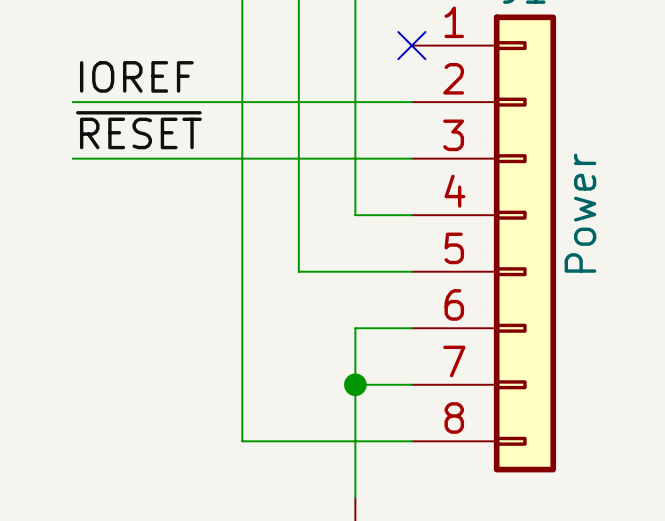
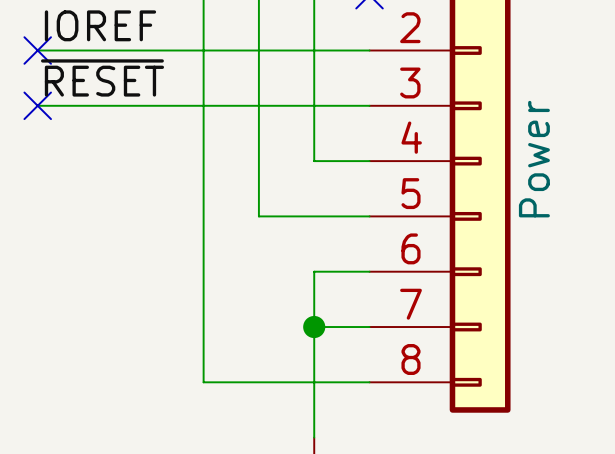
no-connect mark: none -> (37, 50)
no-connect mark: none -> (37, 105)

